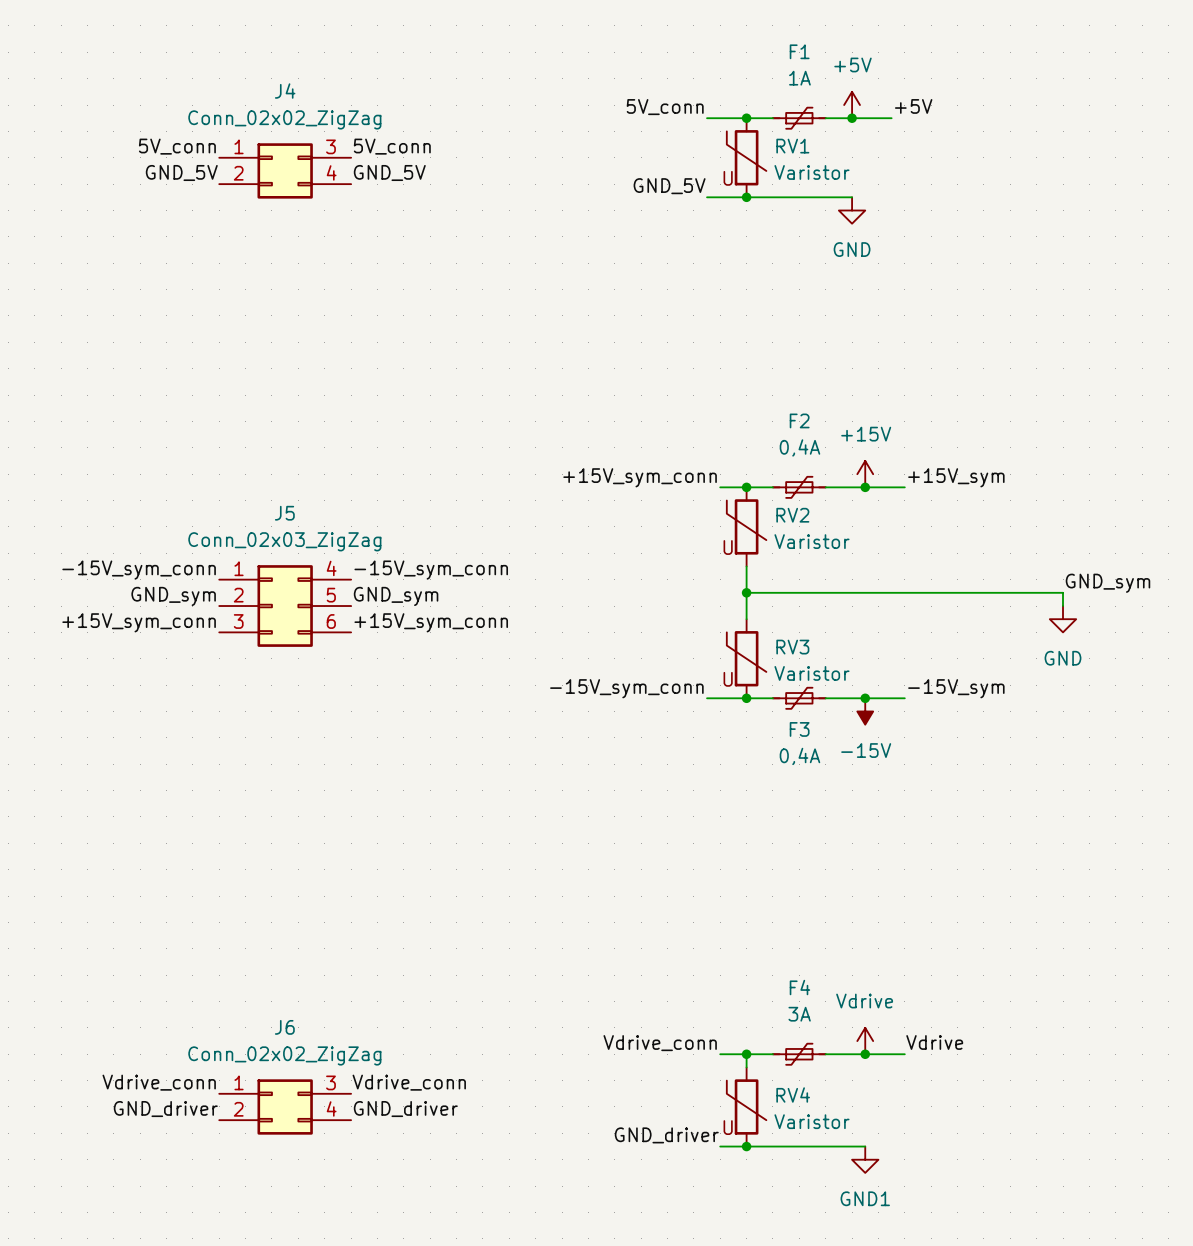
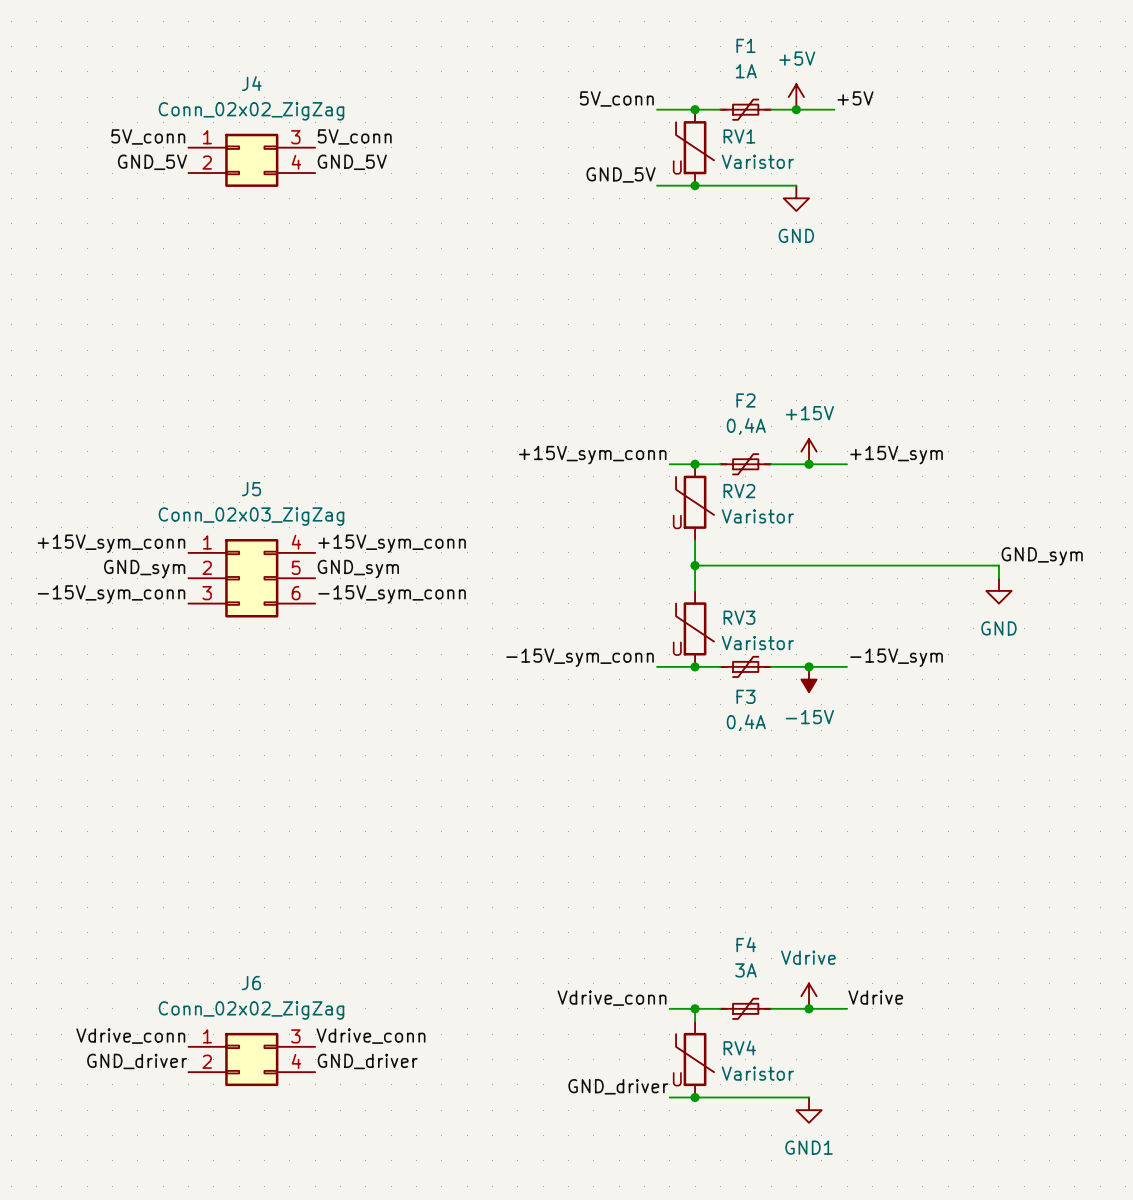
label: -15V_sym_conn (139, 570) -> +15V_sym_conn (111, 543)
label: -15V_sym_conn (431, 570) -> +15V_sym_conn (392, 543)
label: +15V_sym_conn (139, 622) -> -15V_sym_conn (111, 594)
label: +15V_sym_conn (431, 622) -> -15V_sym_conn (392, 594)

